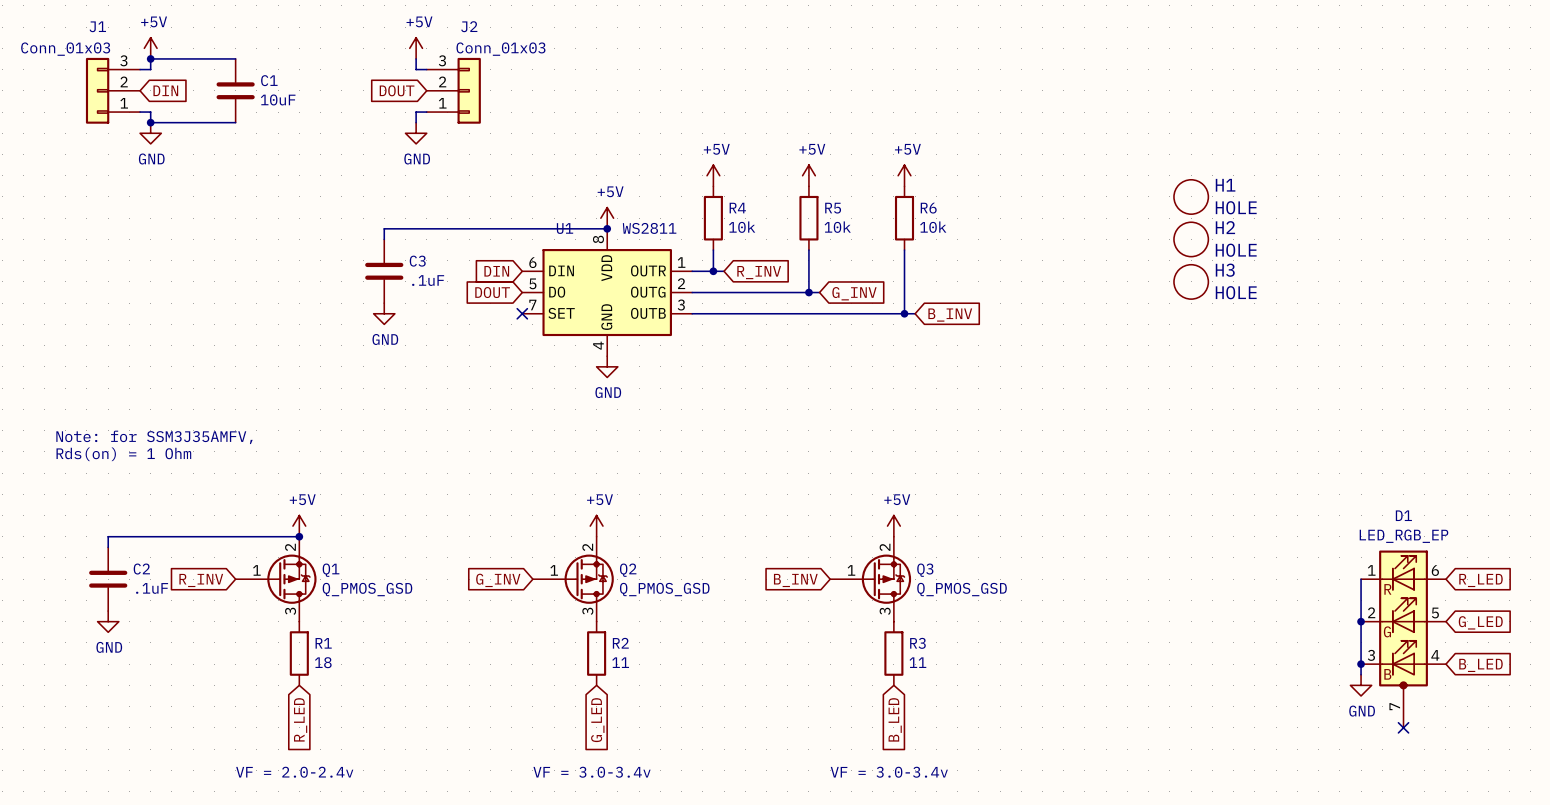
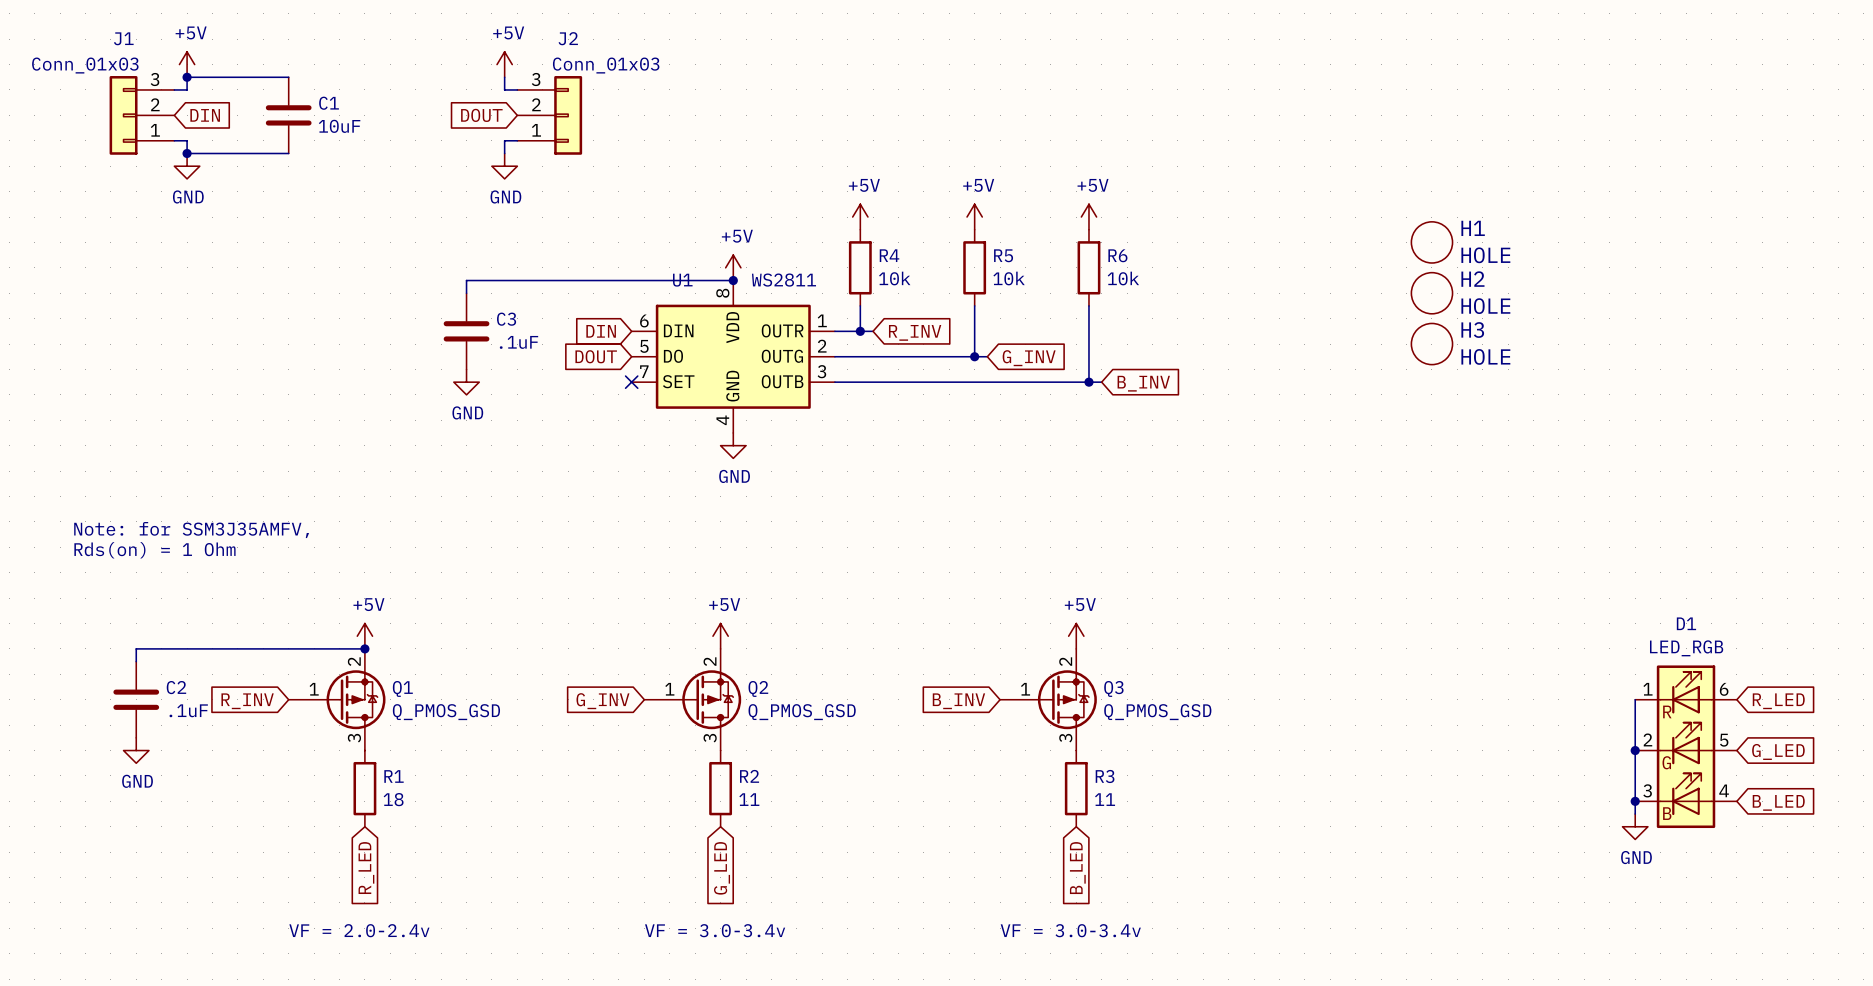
D1 value: LED_RGB_EP (1403, 536) -> LED_RGB (1686, 648)
D1 symbol: [1361, 550, 1446, 728] -> [1635, 665, 1737, 829]
no-connect mark: (1403, 727) -> none

